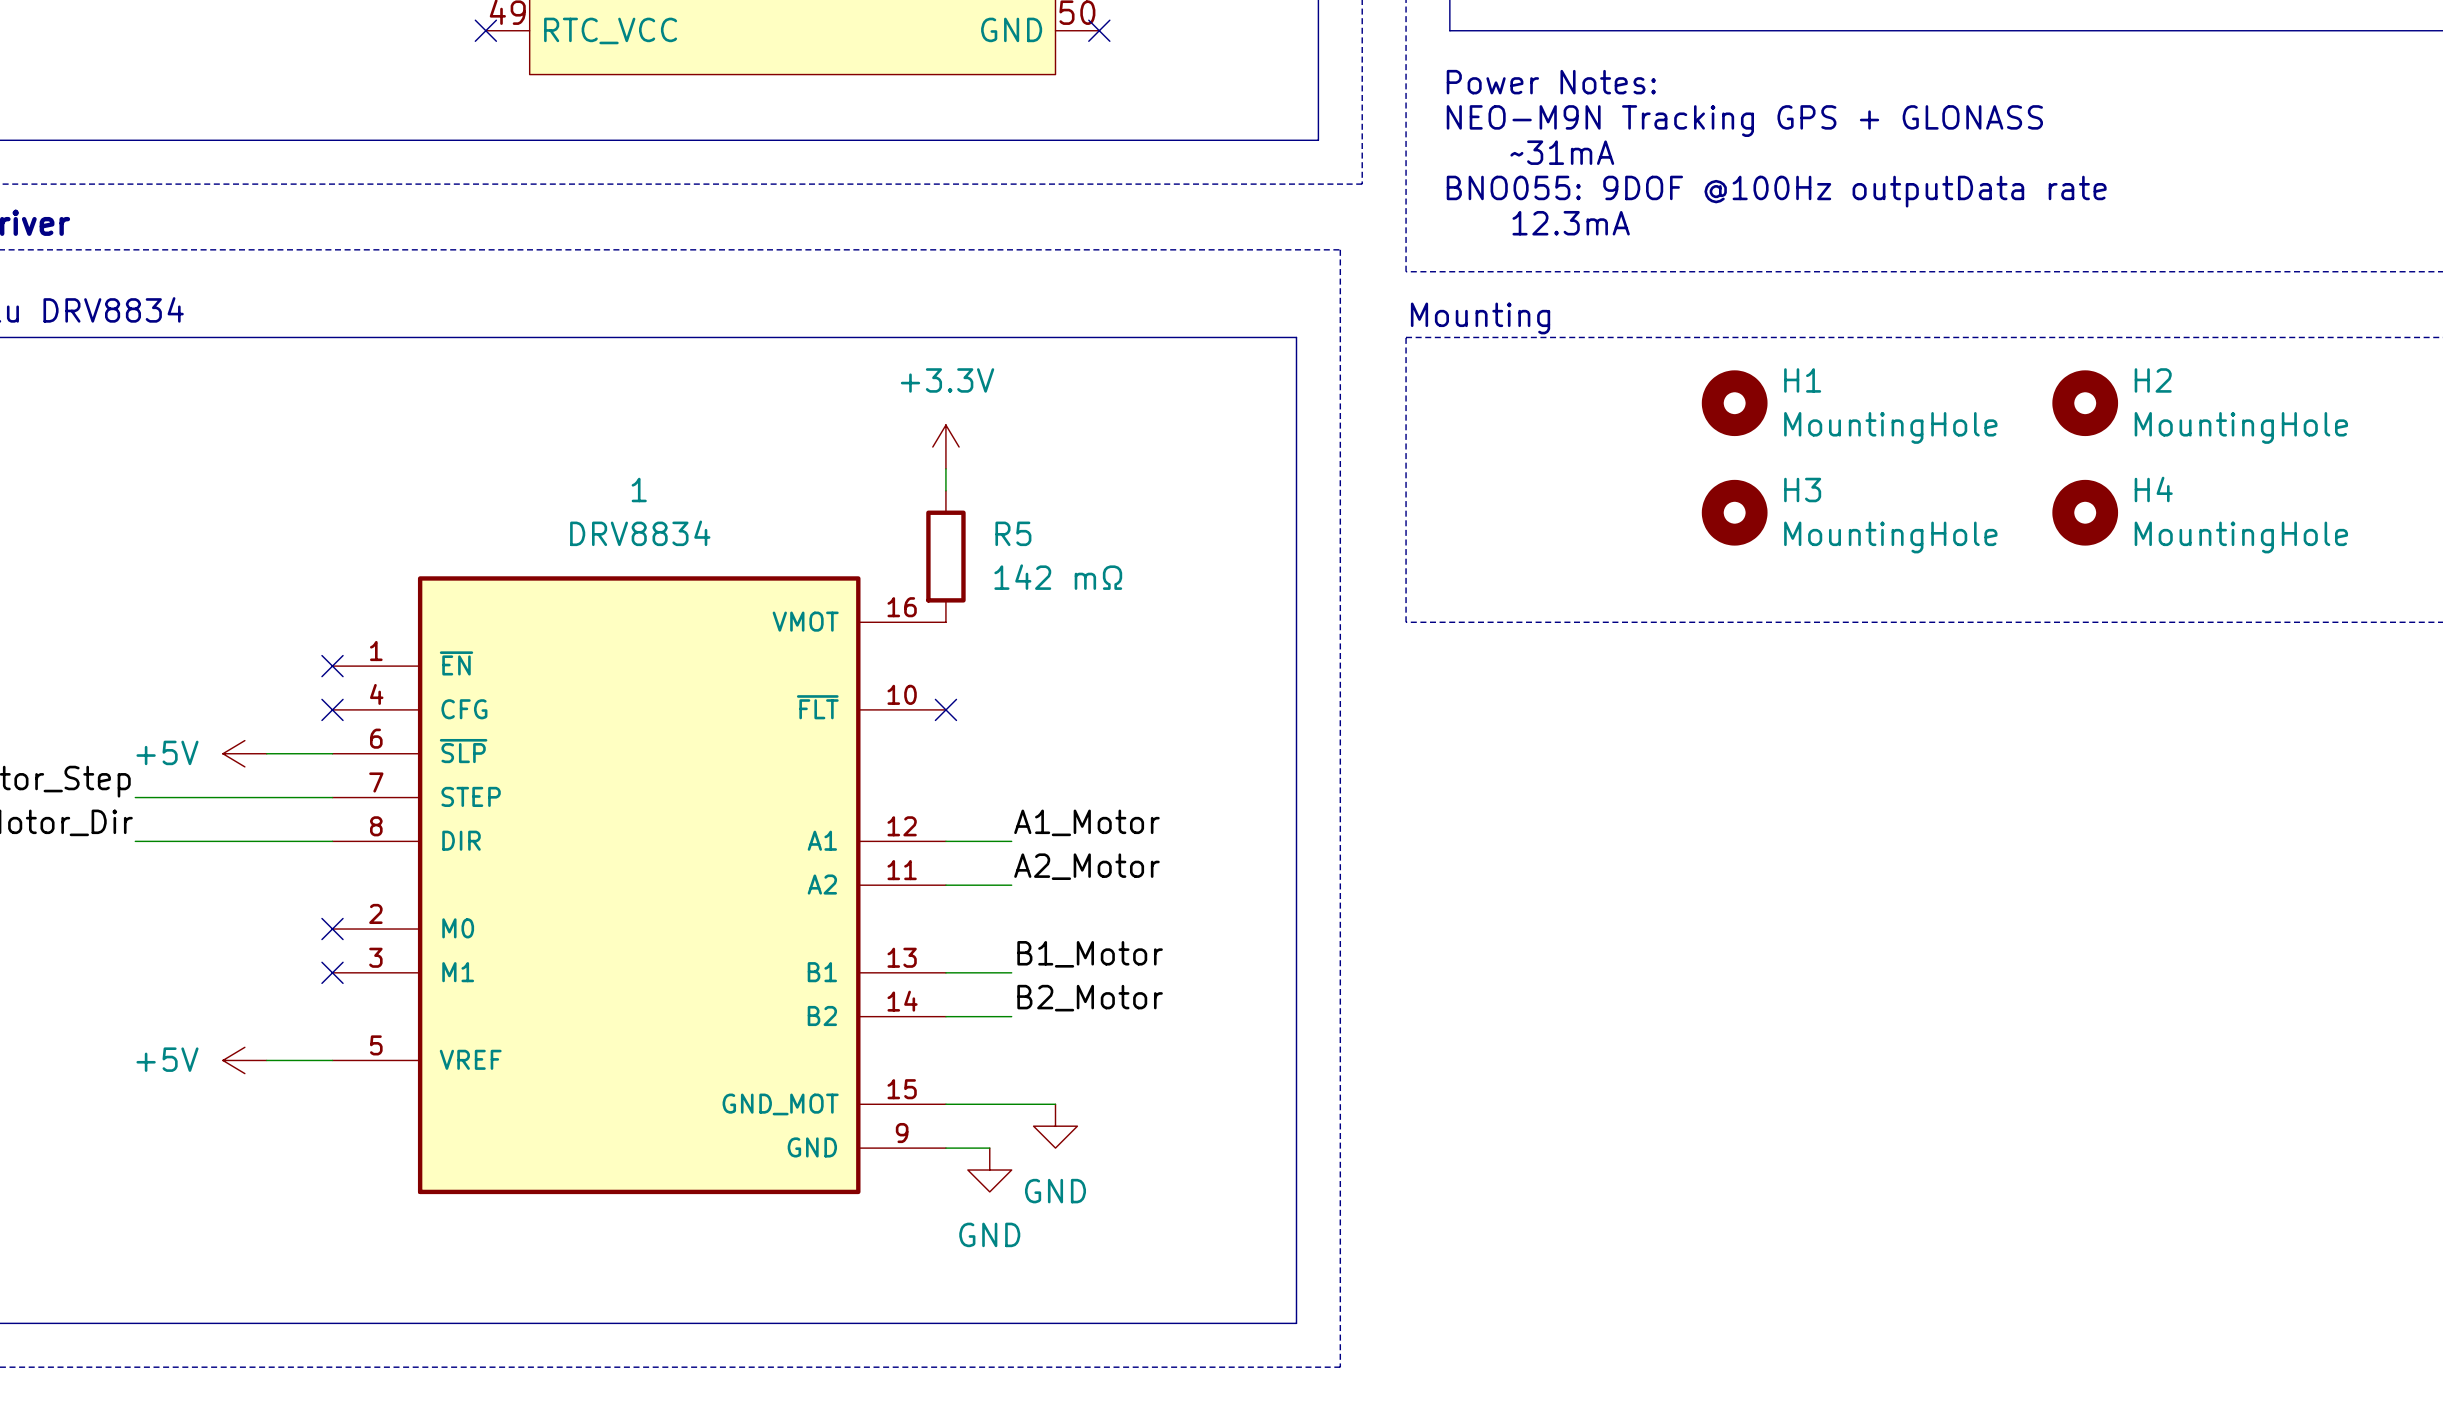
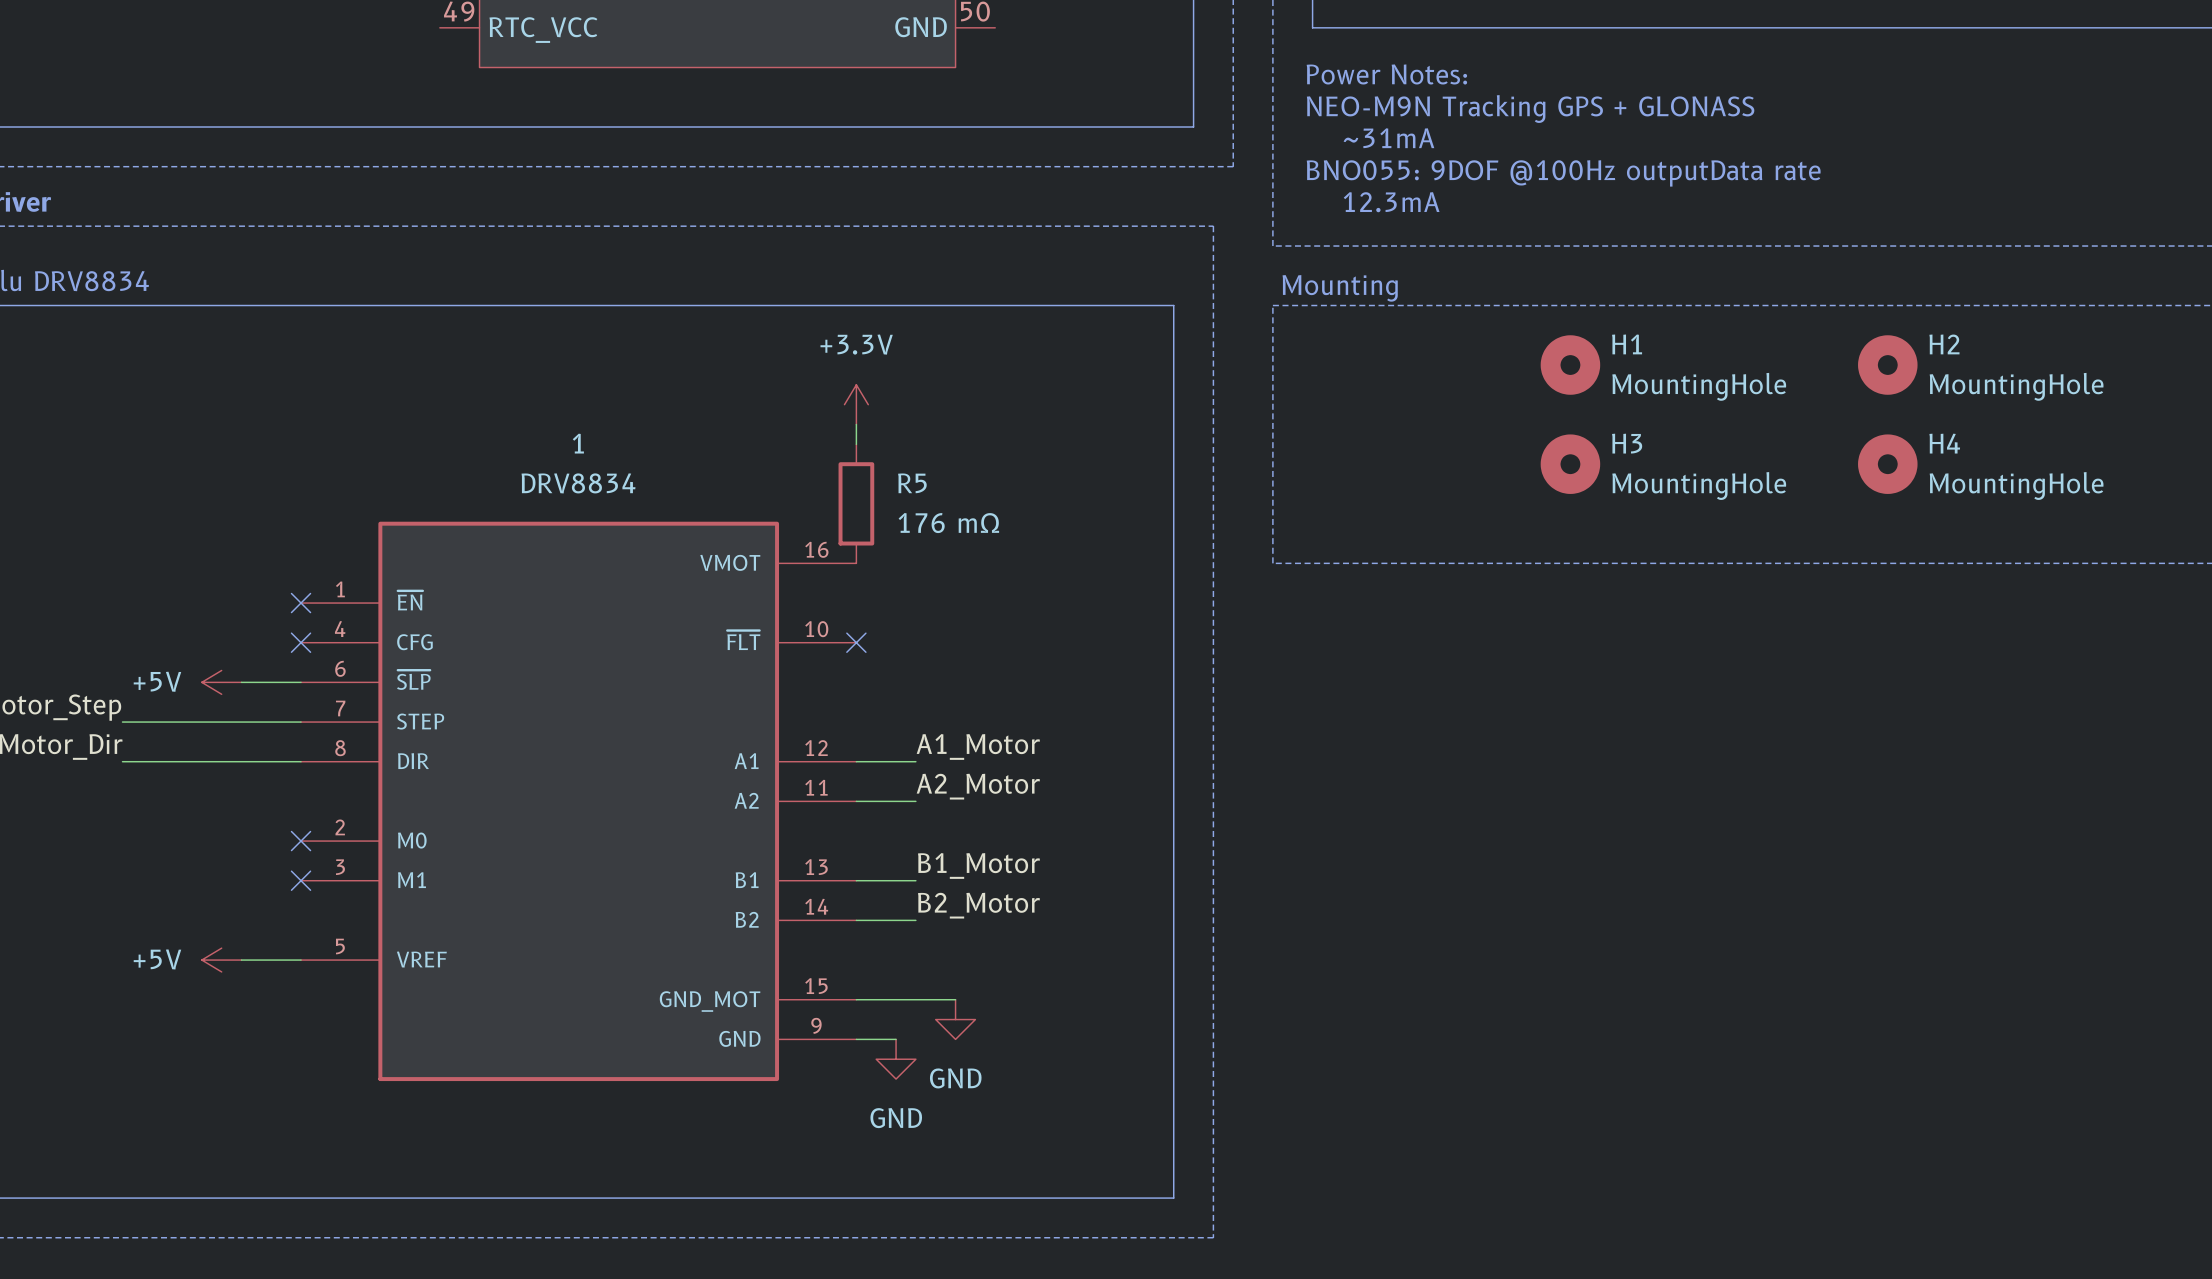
no-connect mark: (485, 30) -> none
no-connect mark: (1099, 30) -> none
R5 value: 142 mΩ (1058, 577) -> 176 mΩ (948, 523)

